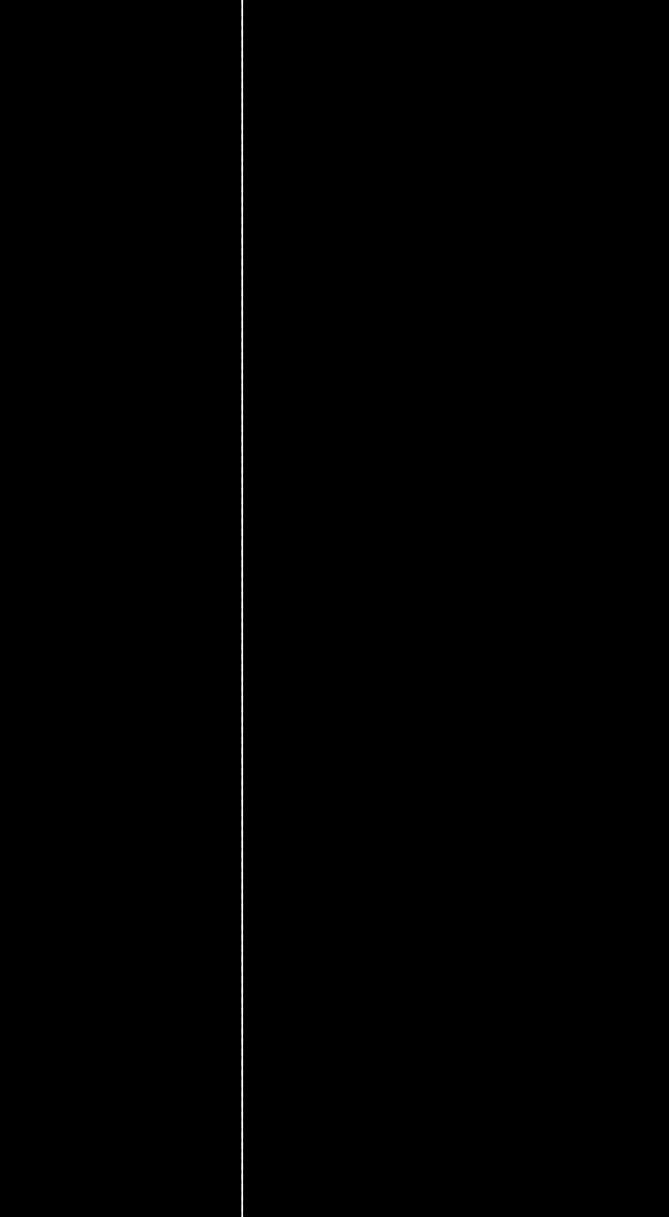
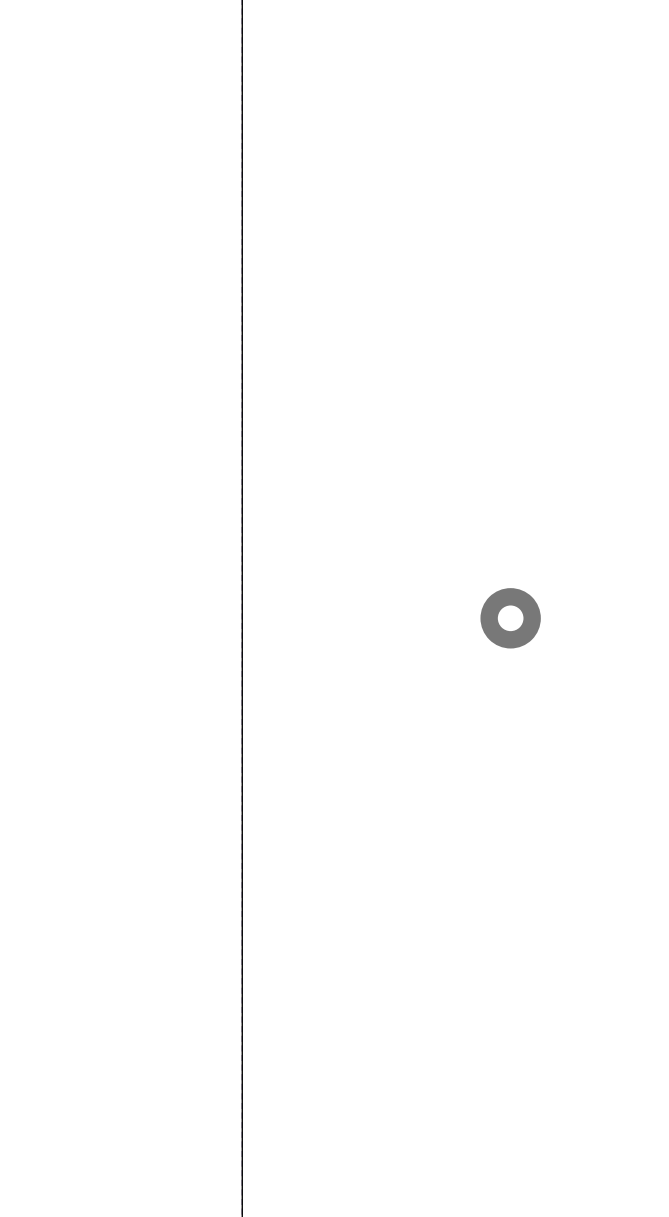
via: none -> (510, 618)

